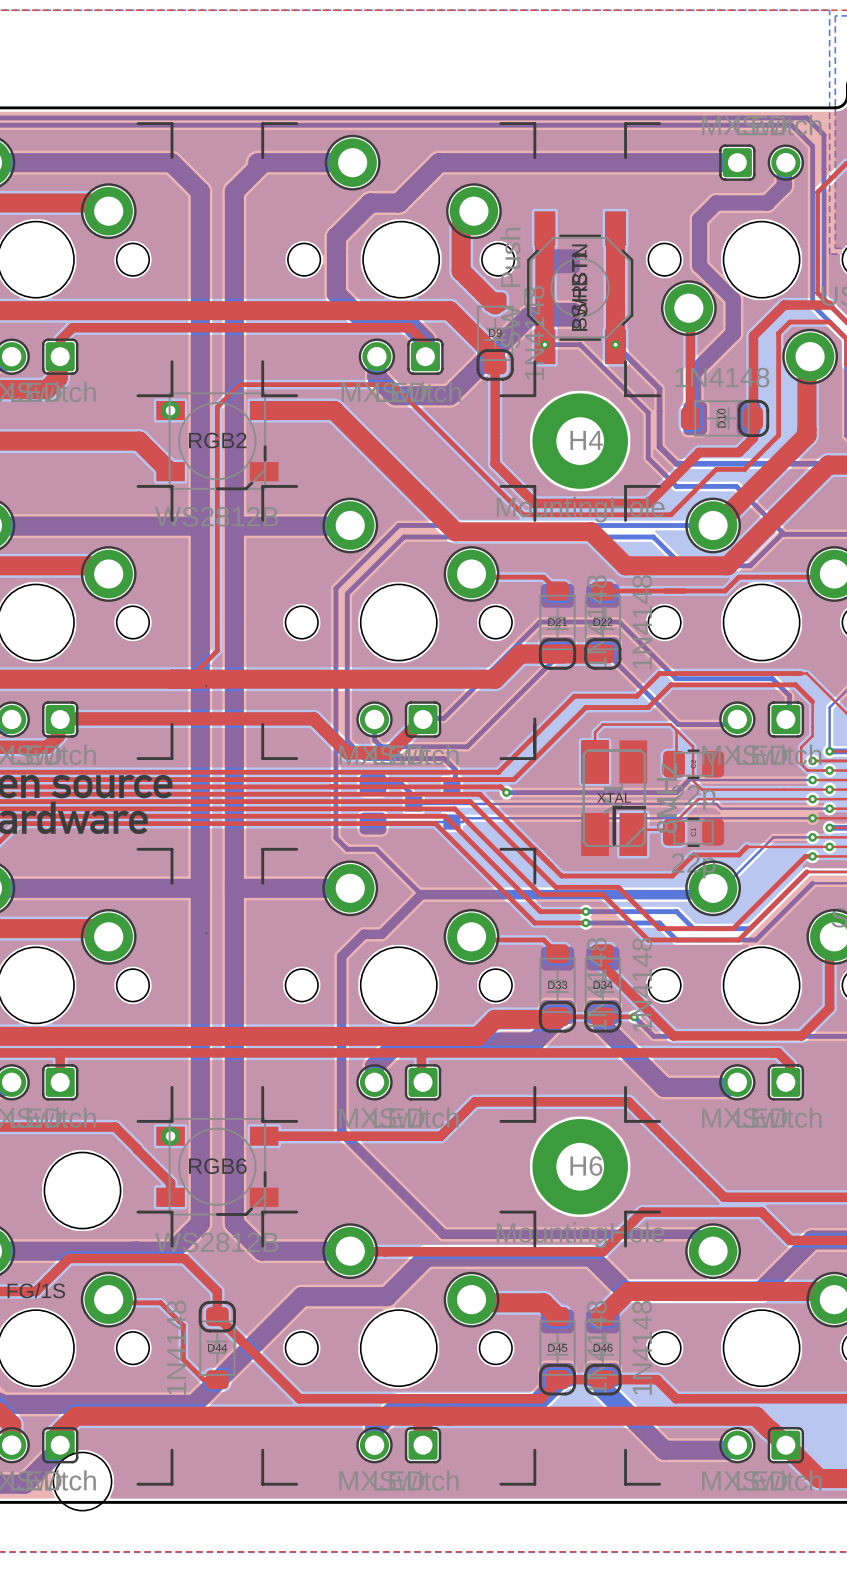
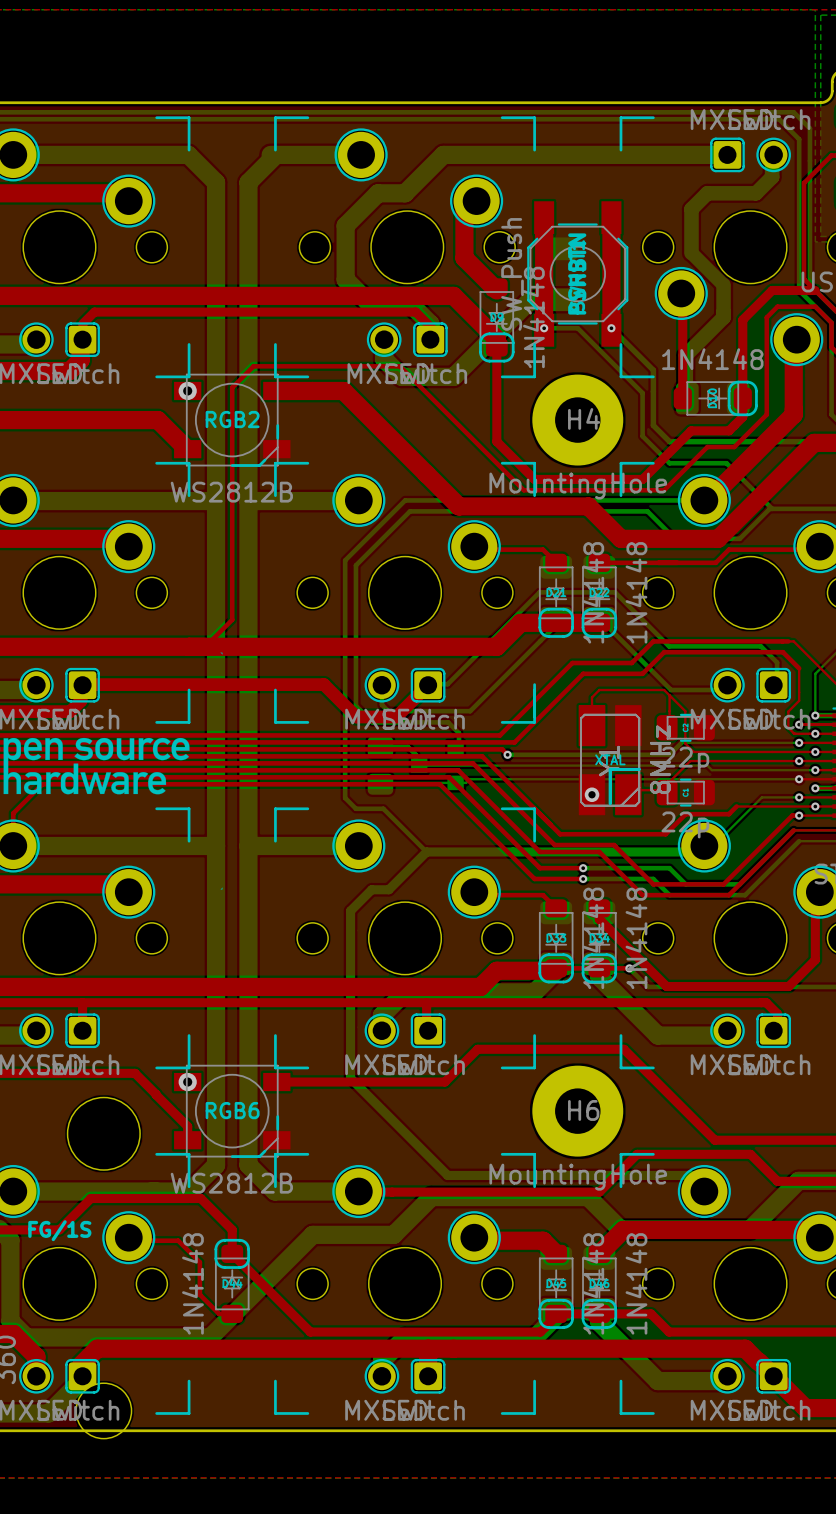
via: none -> (592, 794)

